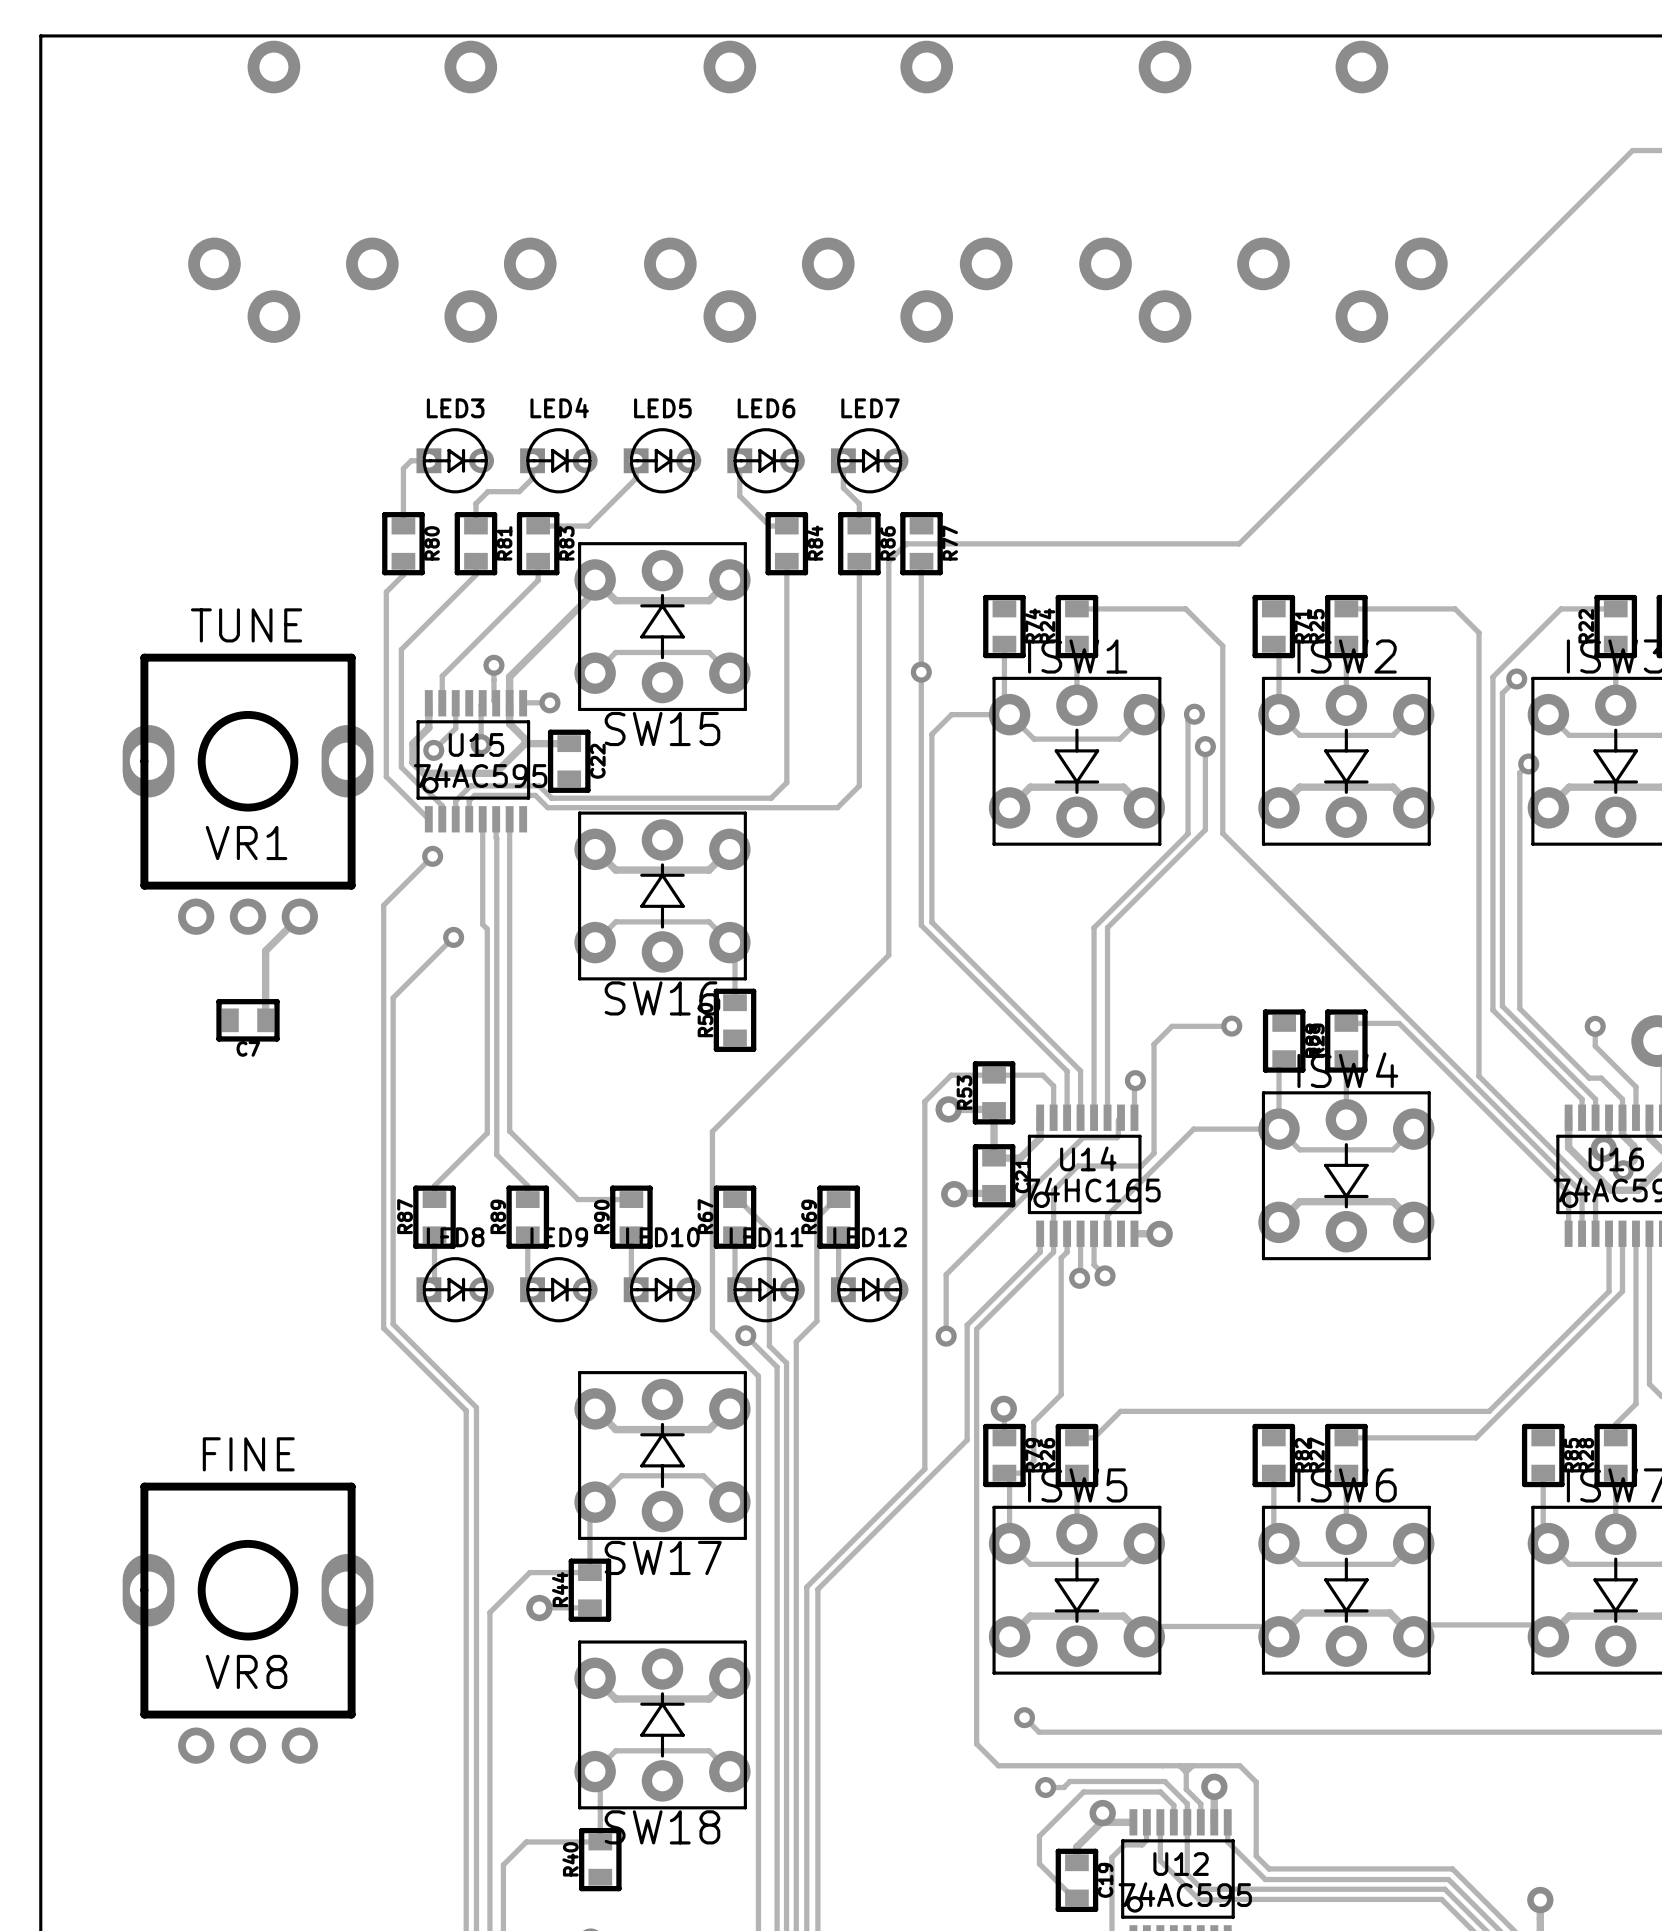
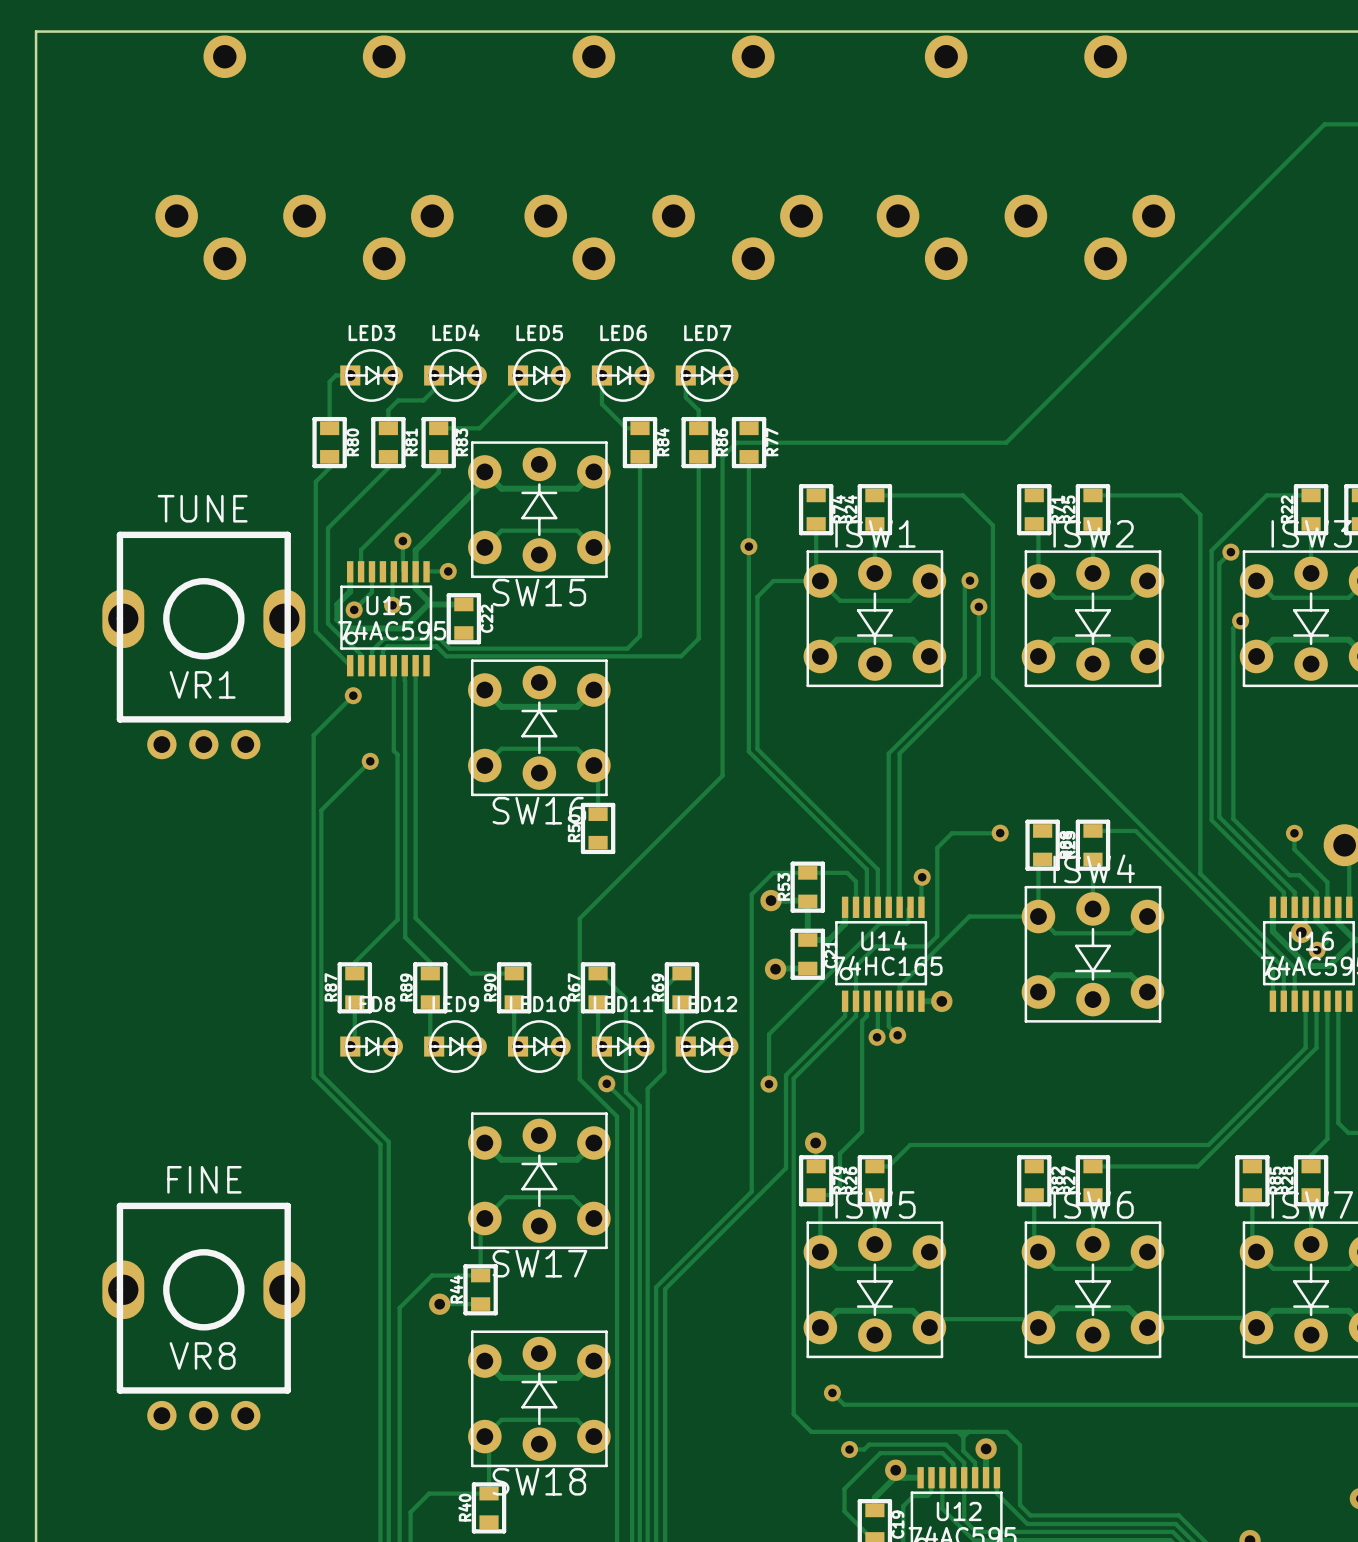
track: (299, 916) (265, 950) (265, 1020) -> none
C7: (248, 1020) -> none

